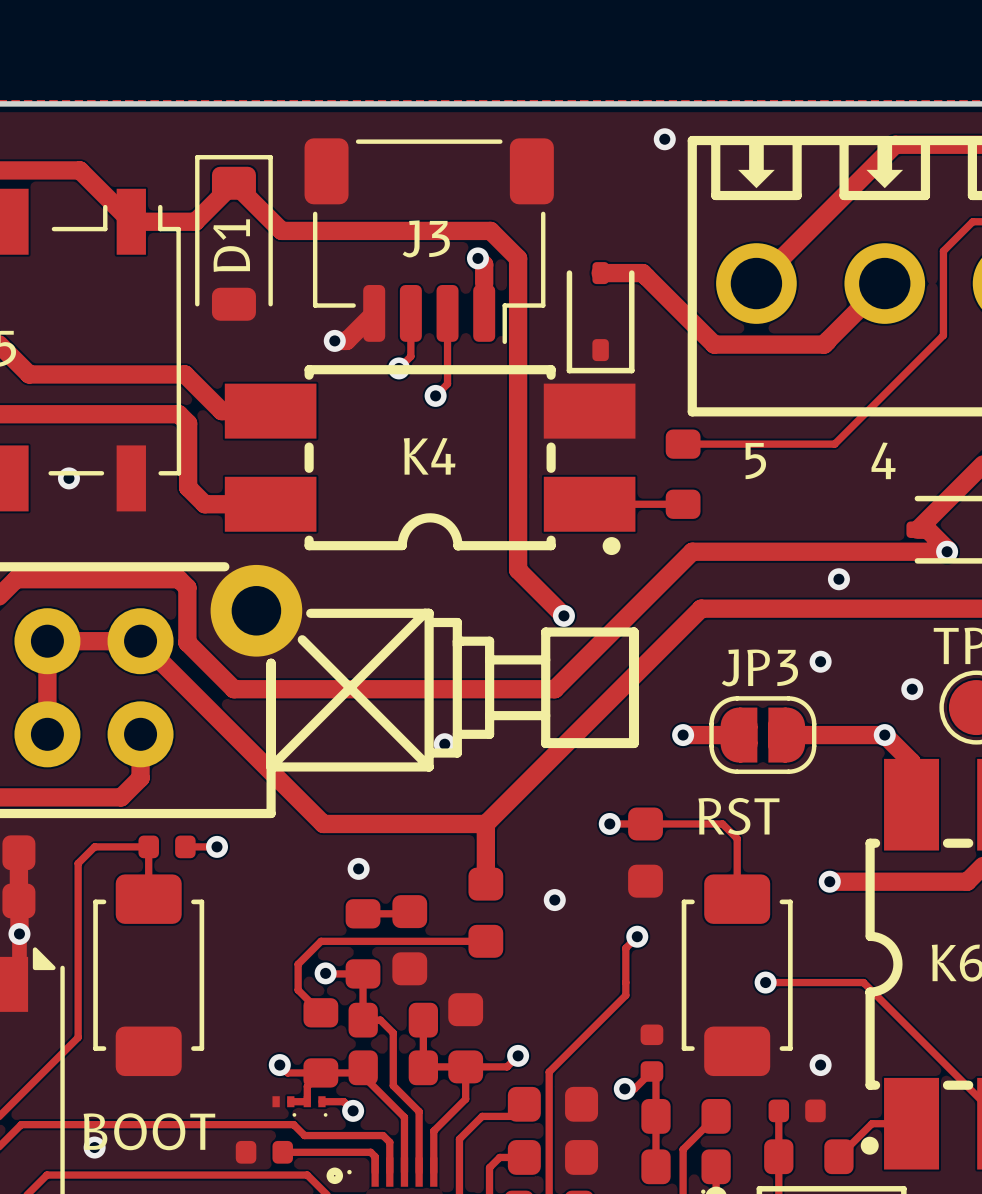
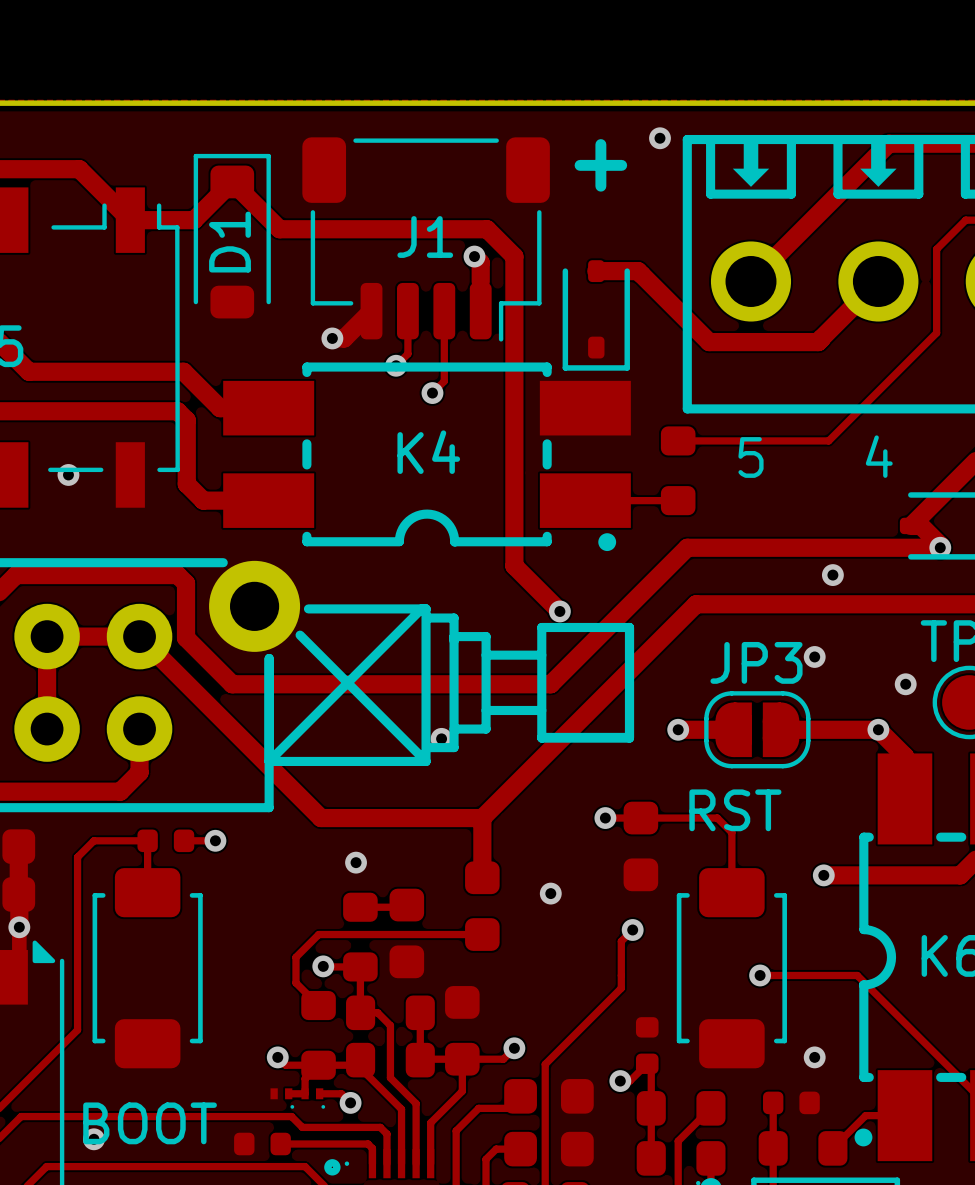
text: none -> + (600, 165)
J3 name: J3 (426, 238) -> J1 (425, 236)

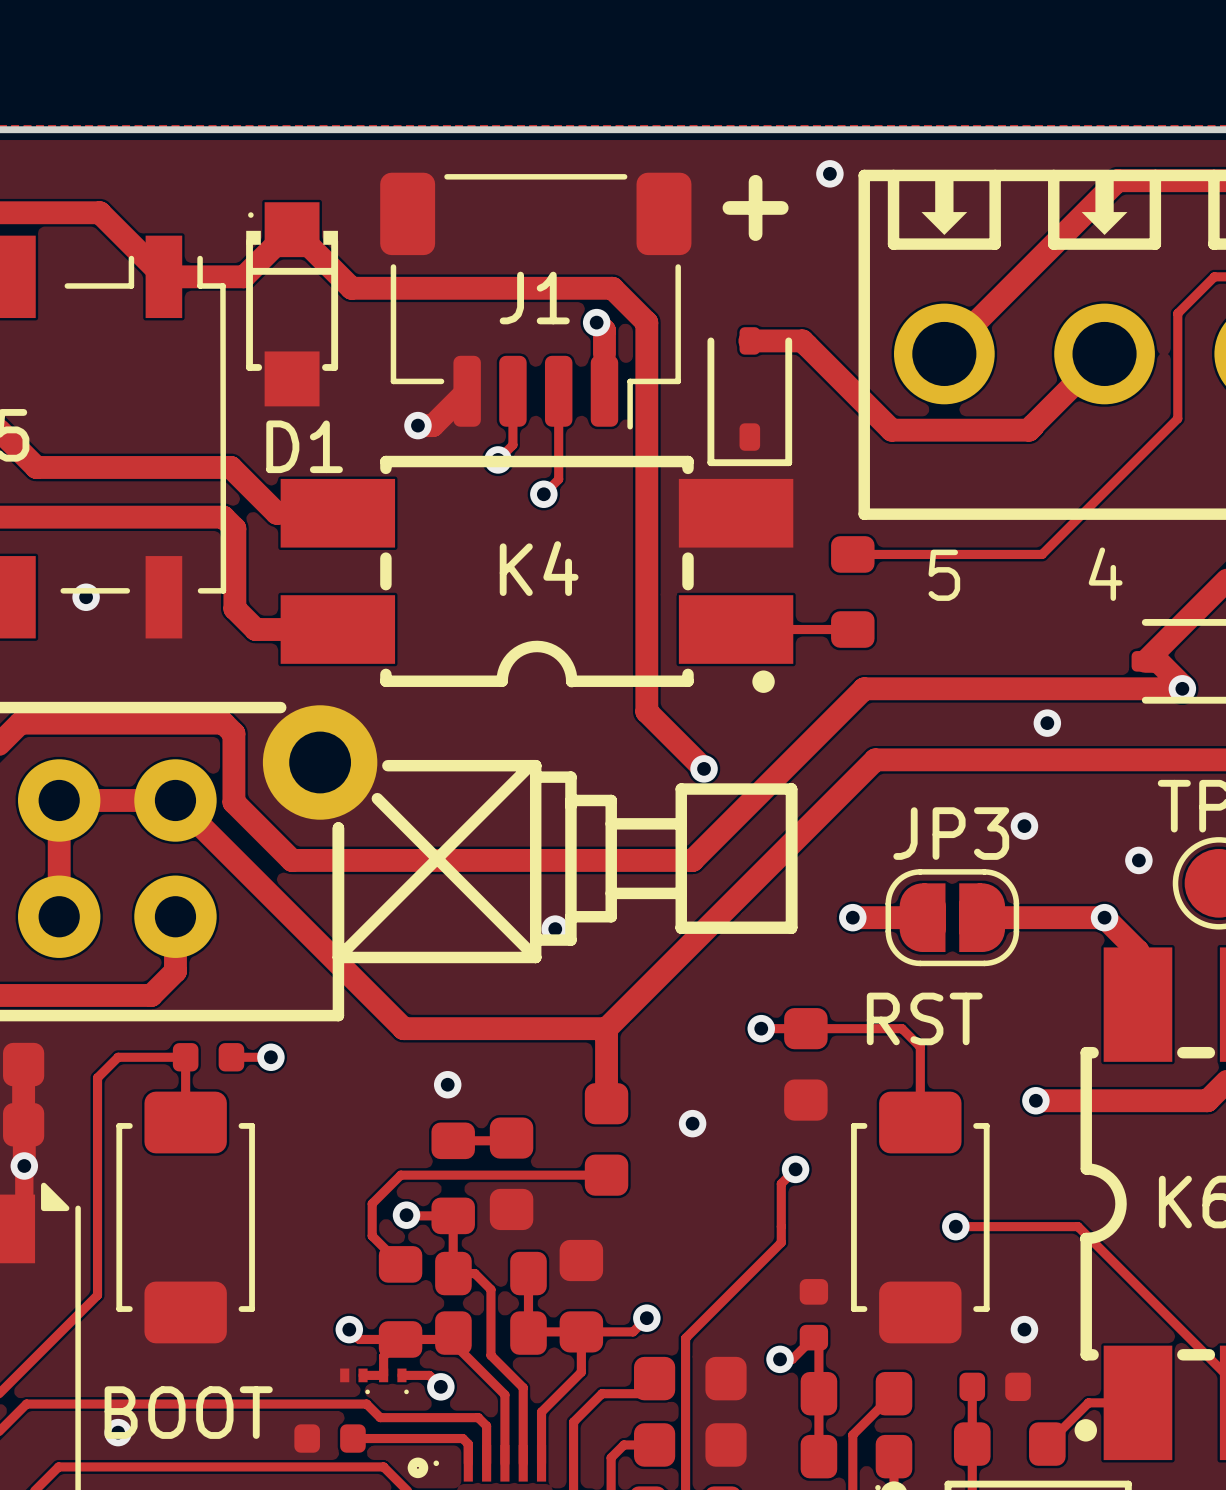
D1 footprint: [193, 153, 271, 319] -> [246, 202, 339, 407]
D1 name position: D1 (230, 242) -> D1 (304, 446)

